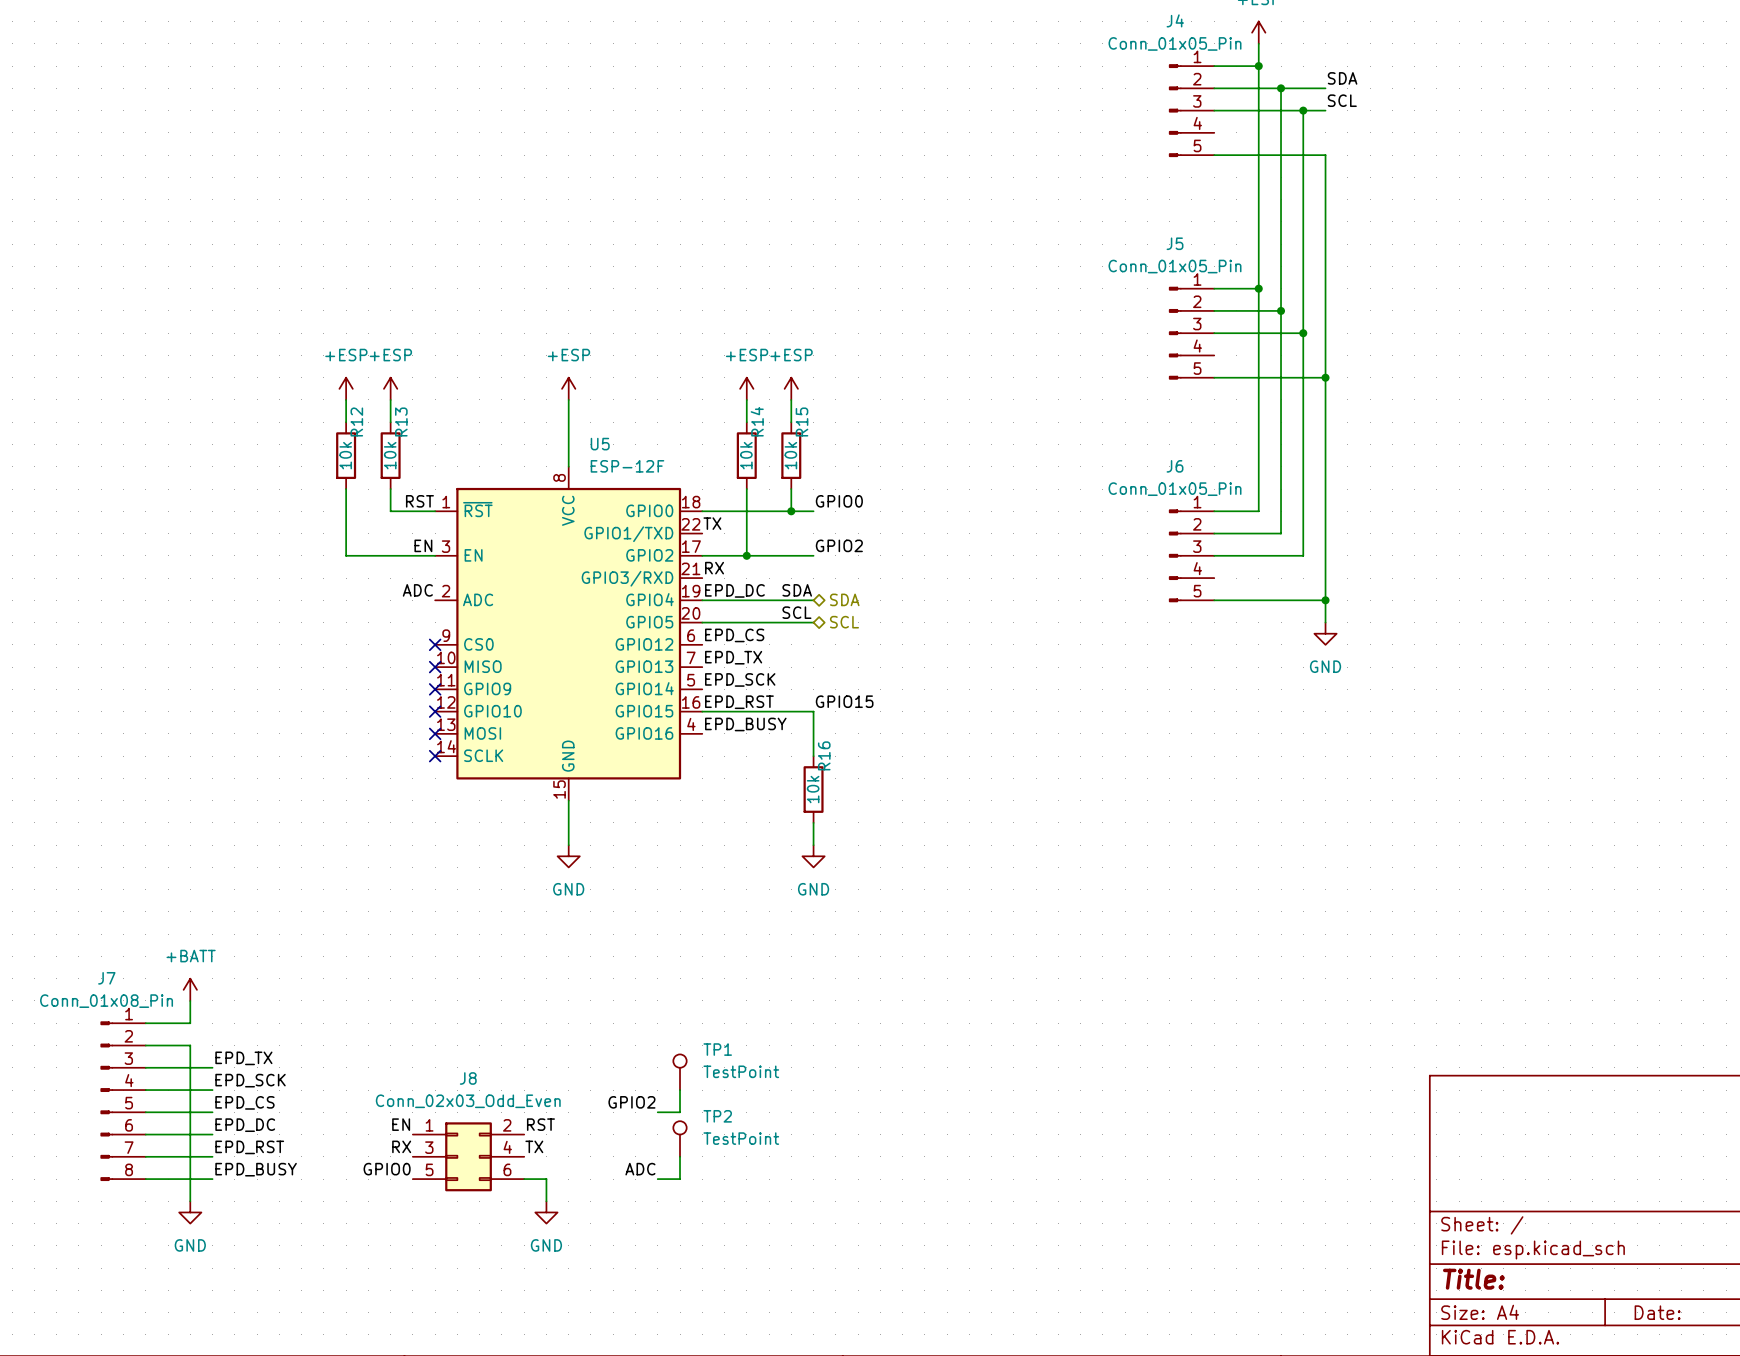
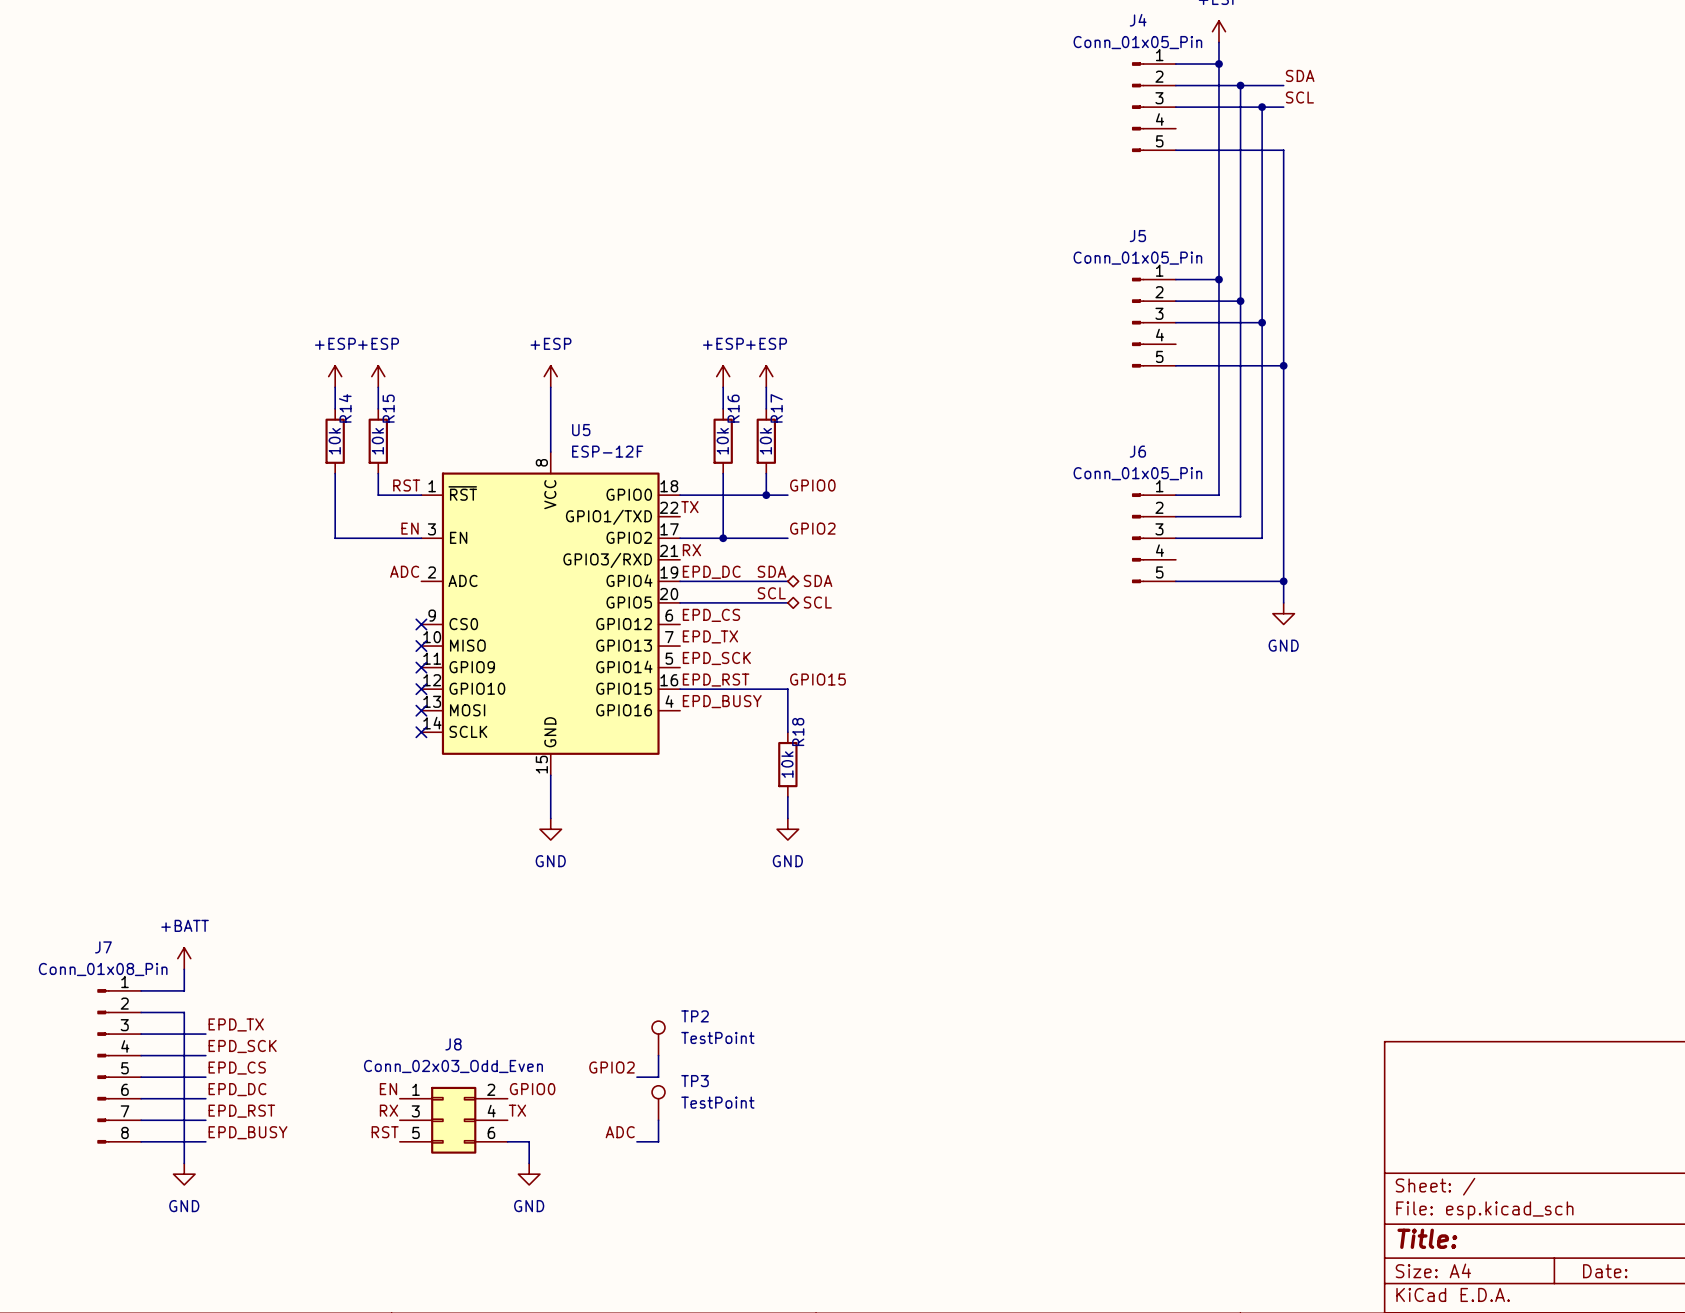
R12 name: R12 (356, 421) -> R14 (345, 408)
R13 name: R13 (401, 421) -> R15 (388, 408)
R14 name: R14 (757, 421) -> R16 (733, 408)
R15 name: R15 (802, 421) -> R17 (776, 408)
R16 name: R16 (824, 755) -> R18 (798, 732)
TP1 name: TP1 (717, 1049) -> TP2 (695, 1016)
TP2 name: TP2 (717, 1116) -> TP3 (695, 1081)
label: RST (540, 1124) -> GPIO0 (532, 1089)
label: GPIO0 (387, 1169) -> RST (385, 1132)

